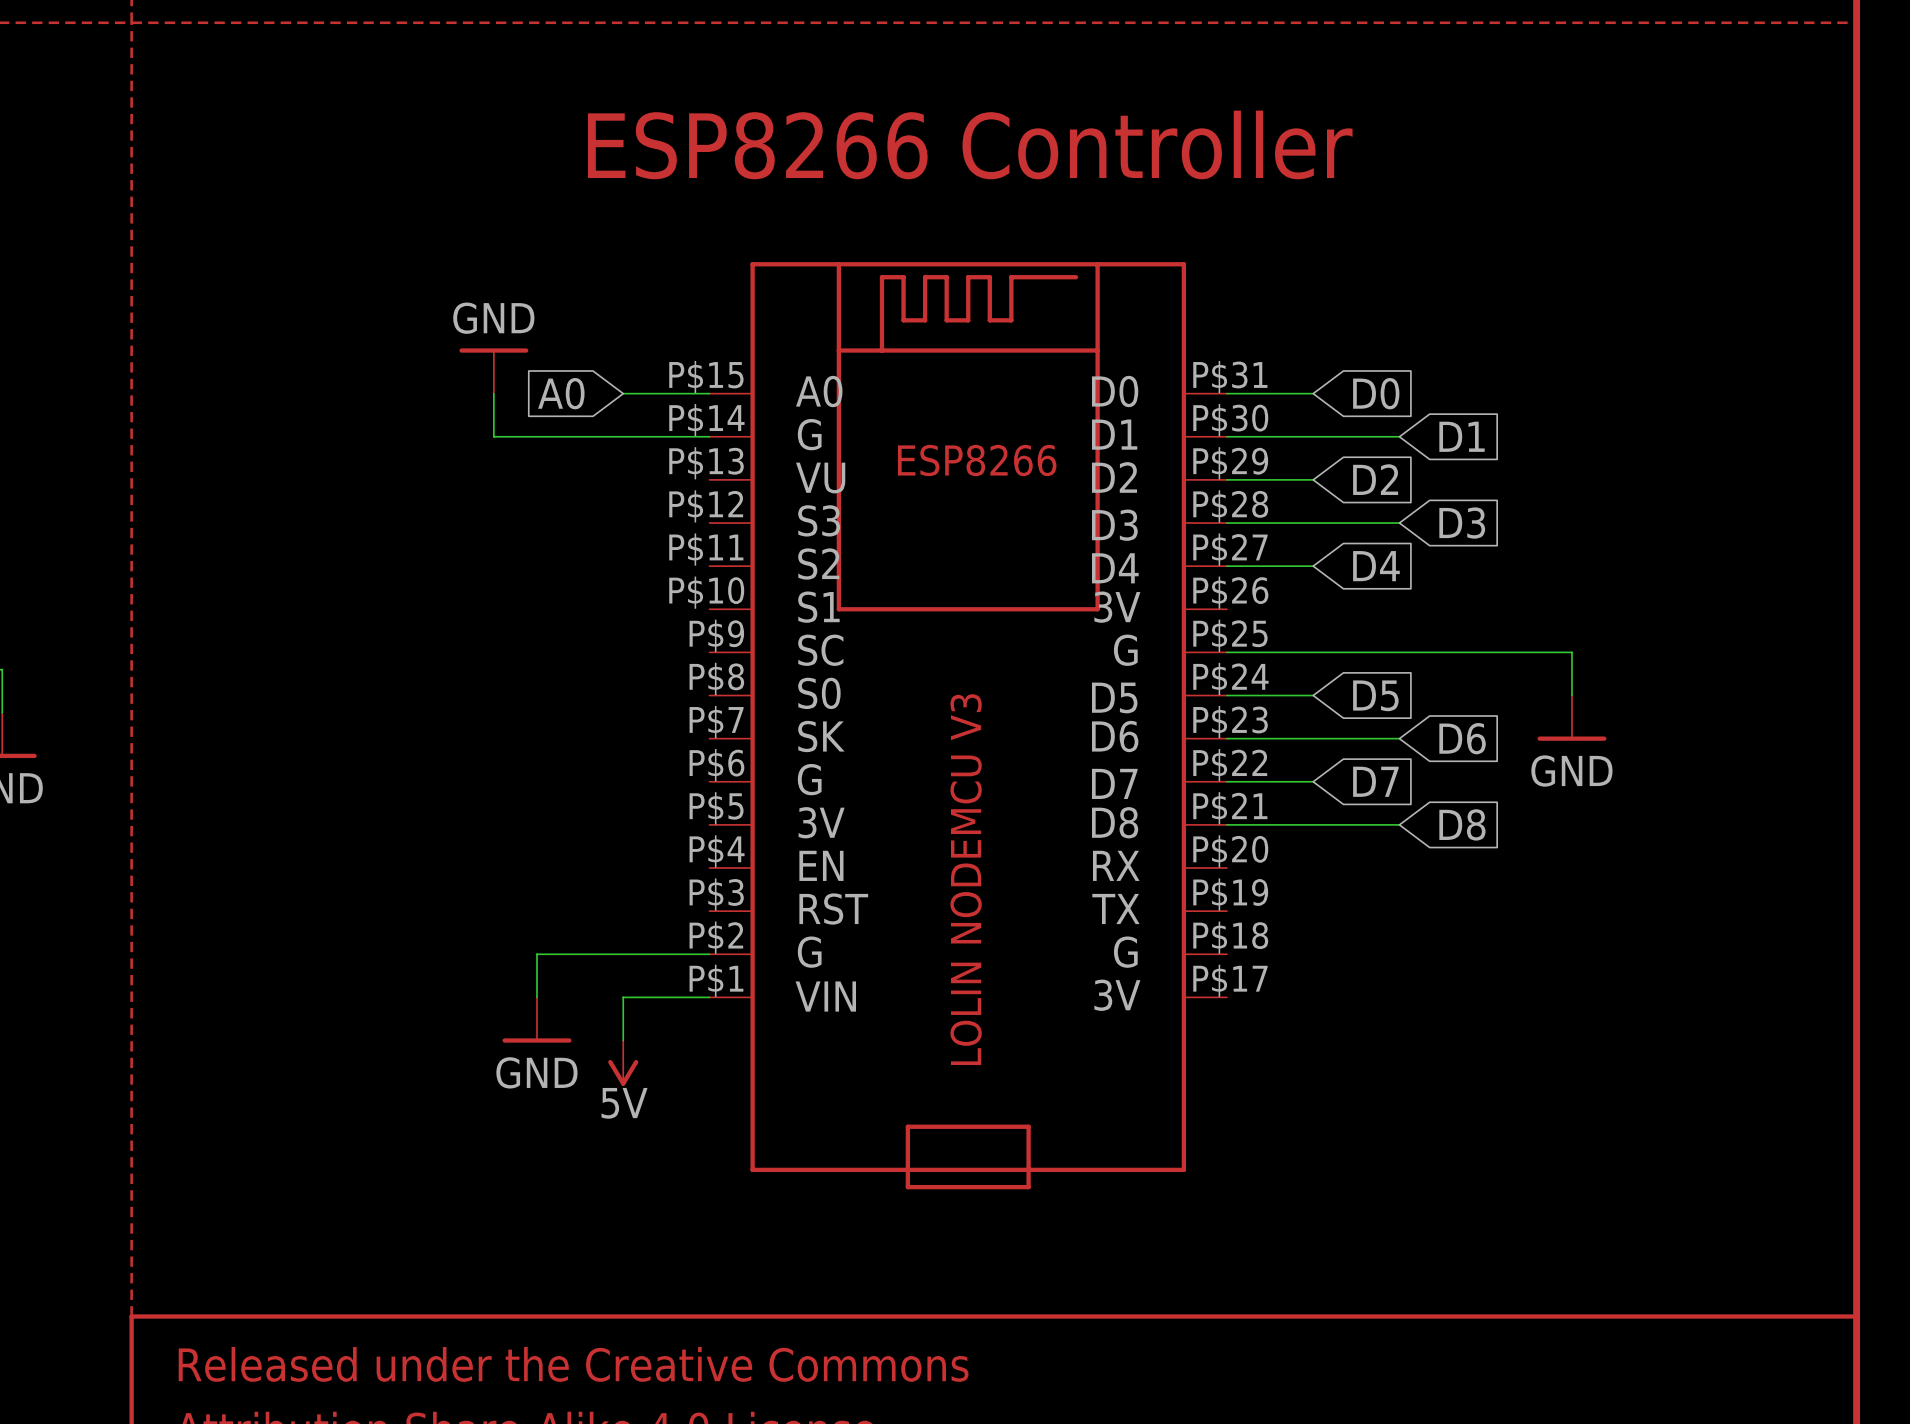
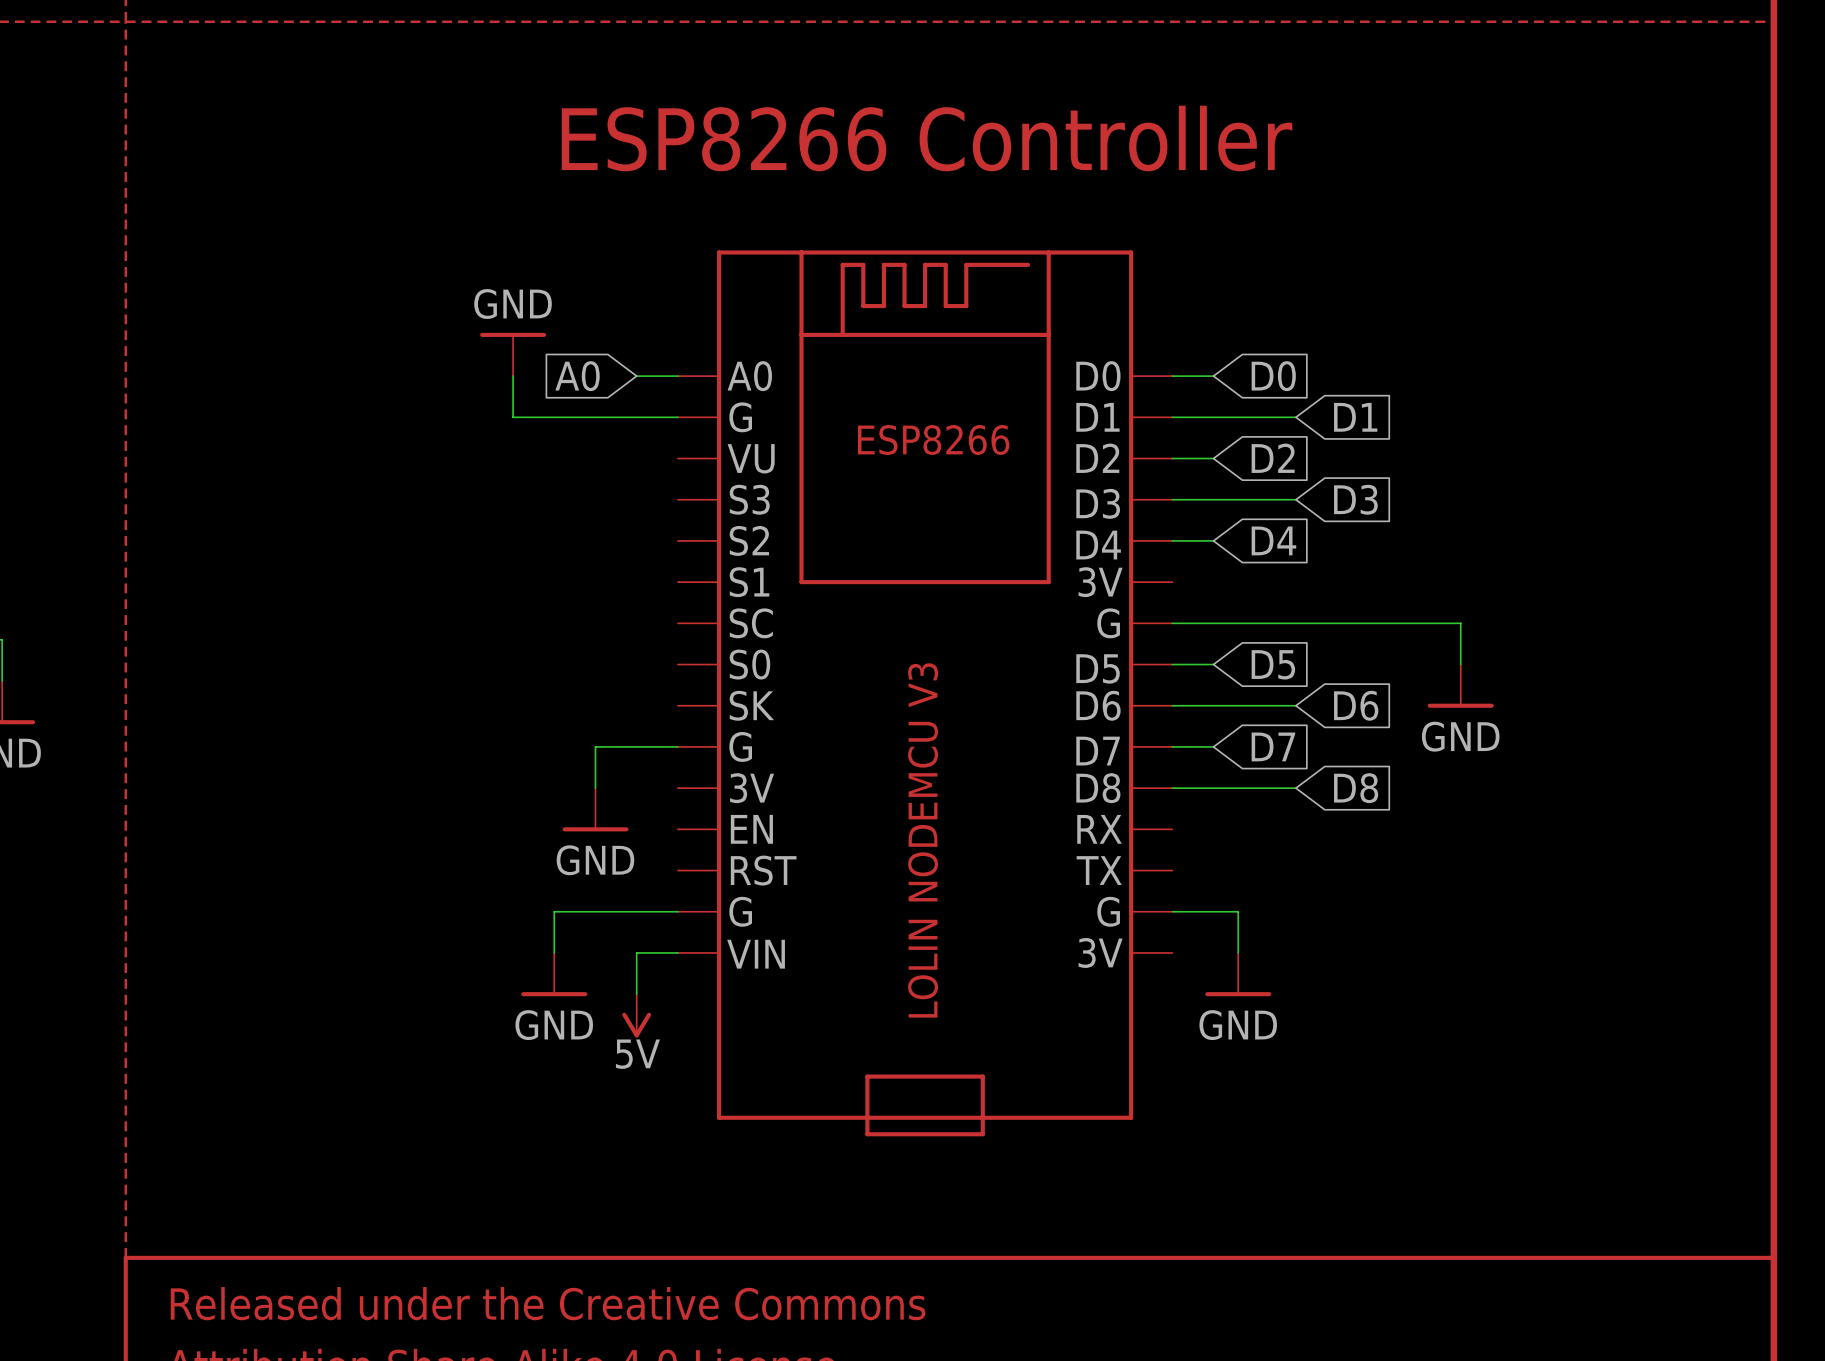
part symbol: [709, 262, 1227, 1190] -> [677, 250, 1173, 1137]
power symbol position: GND (493, 371) -> GND (513, 354)
wire: (493, 393) (493, 436) (536, 436) -> (513, 376) (513, 417)
global label position: A0 (561, 393) -> A0 (577, 376)
wire: (623, 393) (666, 393) -> none
wire: (1270, 393) (1313, 393) -> none
global label position: D0 (1376, 393) -> D0 (1273, 376)
wire: (1356, 436) (1399, 436) -> none
global label position: D1 (1462, 436) -> D1 (1355, 417)
wire: (1270, 479) (1313, 479) -> none
global label position: D2 (1375, 479) -> D2 (1273, 458)
wire: (1356, 523) (1399, 523) -> none
global label position: D3 (1462, 523) -> D3 (1355, 499)
wire: (1270, 566) (1313, 566) -> none
global label position: D4 (1376, 566) -> D4 (1273, 540)
wire: (1528, 652) (1571, 652) (1571, 695) -> (1460, 623) (1460, 664)
wire: (1270, 695) (1313, 695) -> none
global label position: D5 (1375, 695) -> D5 (1273, 664)
power symbol position: GND (1571, 718) -> GND (1460, 686)
wire: (1356, 738) (1399, 738) -> none
global label position: D6 (1462, 738) -> D6 (1356, 705)
wire: none -> (677, 746) (595, 746) (595, 788)
wire: (1270, 781) (1313, 781) -> none
global label position: D7 (1375, 781) -> D7 (1273, 746)
wire: (1356, 824) (1399, 824) -> none
global label position: D8 (1462, 824) -> D8 (1356, 788)
power symbol: none -> GND (595, 809)
wire: (580, 954) (536, 954) (536, 997) -> (554, 911) (554, 952)
wire: none -> (1172, 911) (1238, 911) (1238, 952)
wire: (666, 997) (623, 997) (623, 1040) -> (636, 952) (636, 994)
power symbol position: GND (536, 1020) -> GND (554, 974)
power symbol: none -> GND (1238, 974)
power symbol position: 5V (623, 1063) -> 5V (636, 1015)

